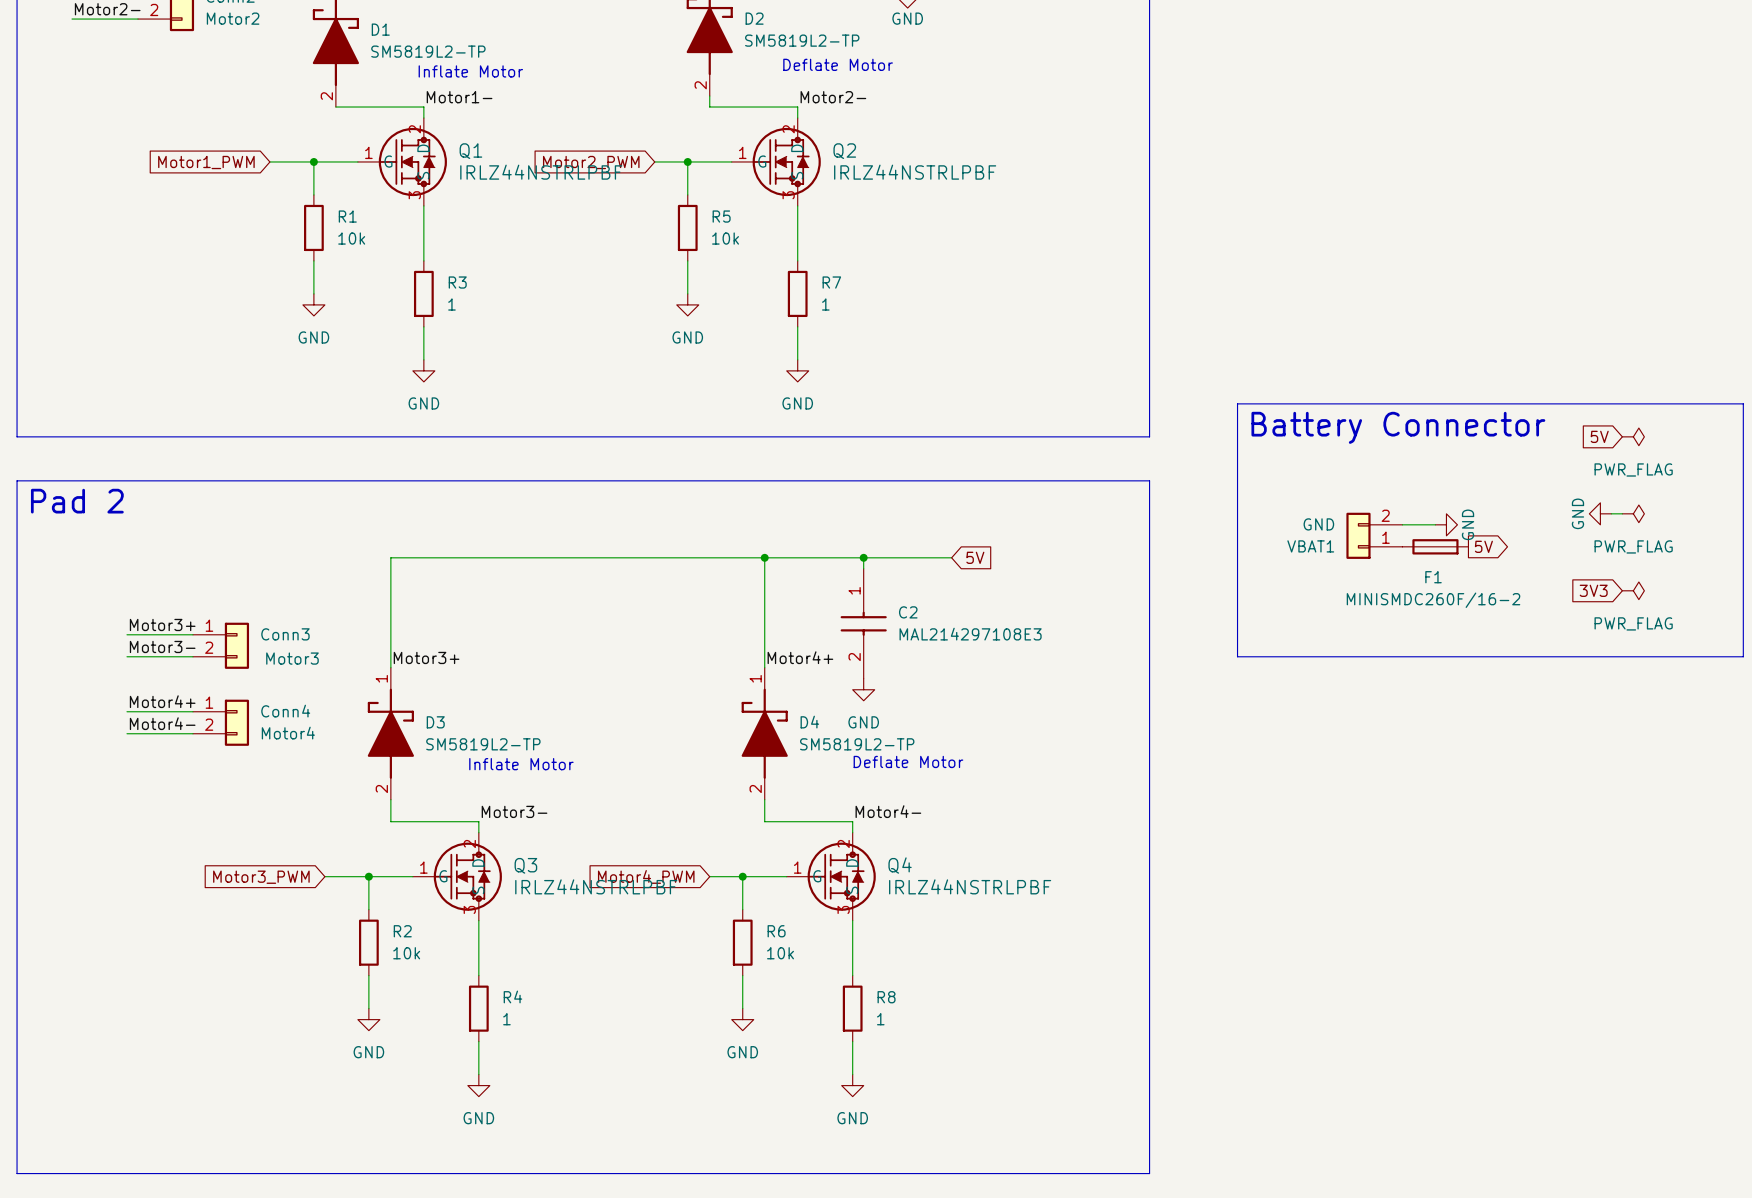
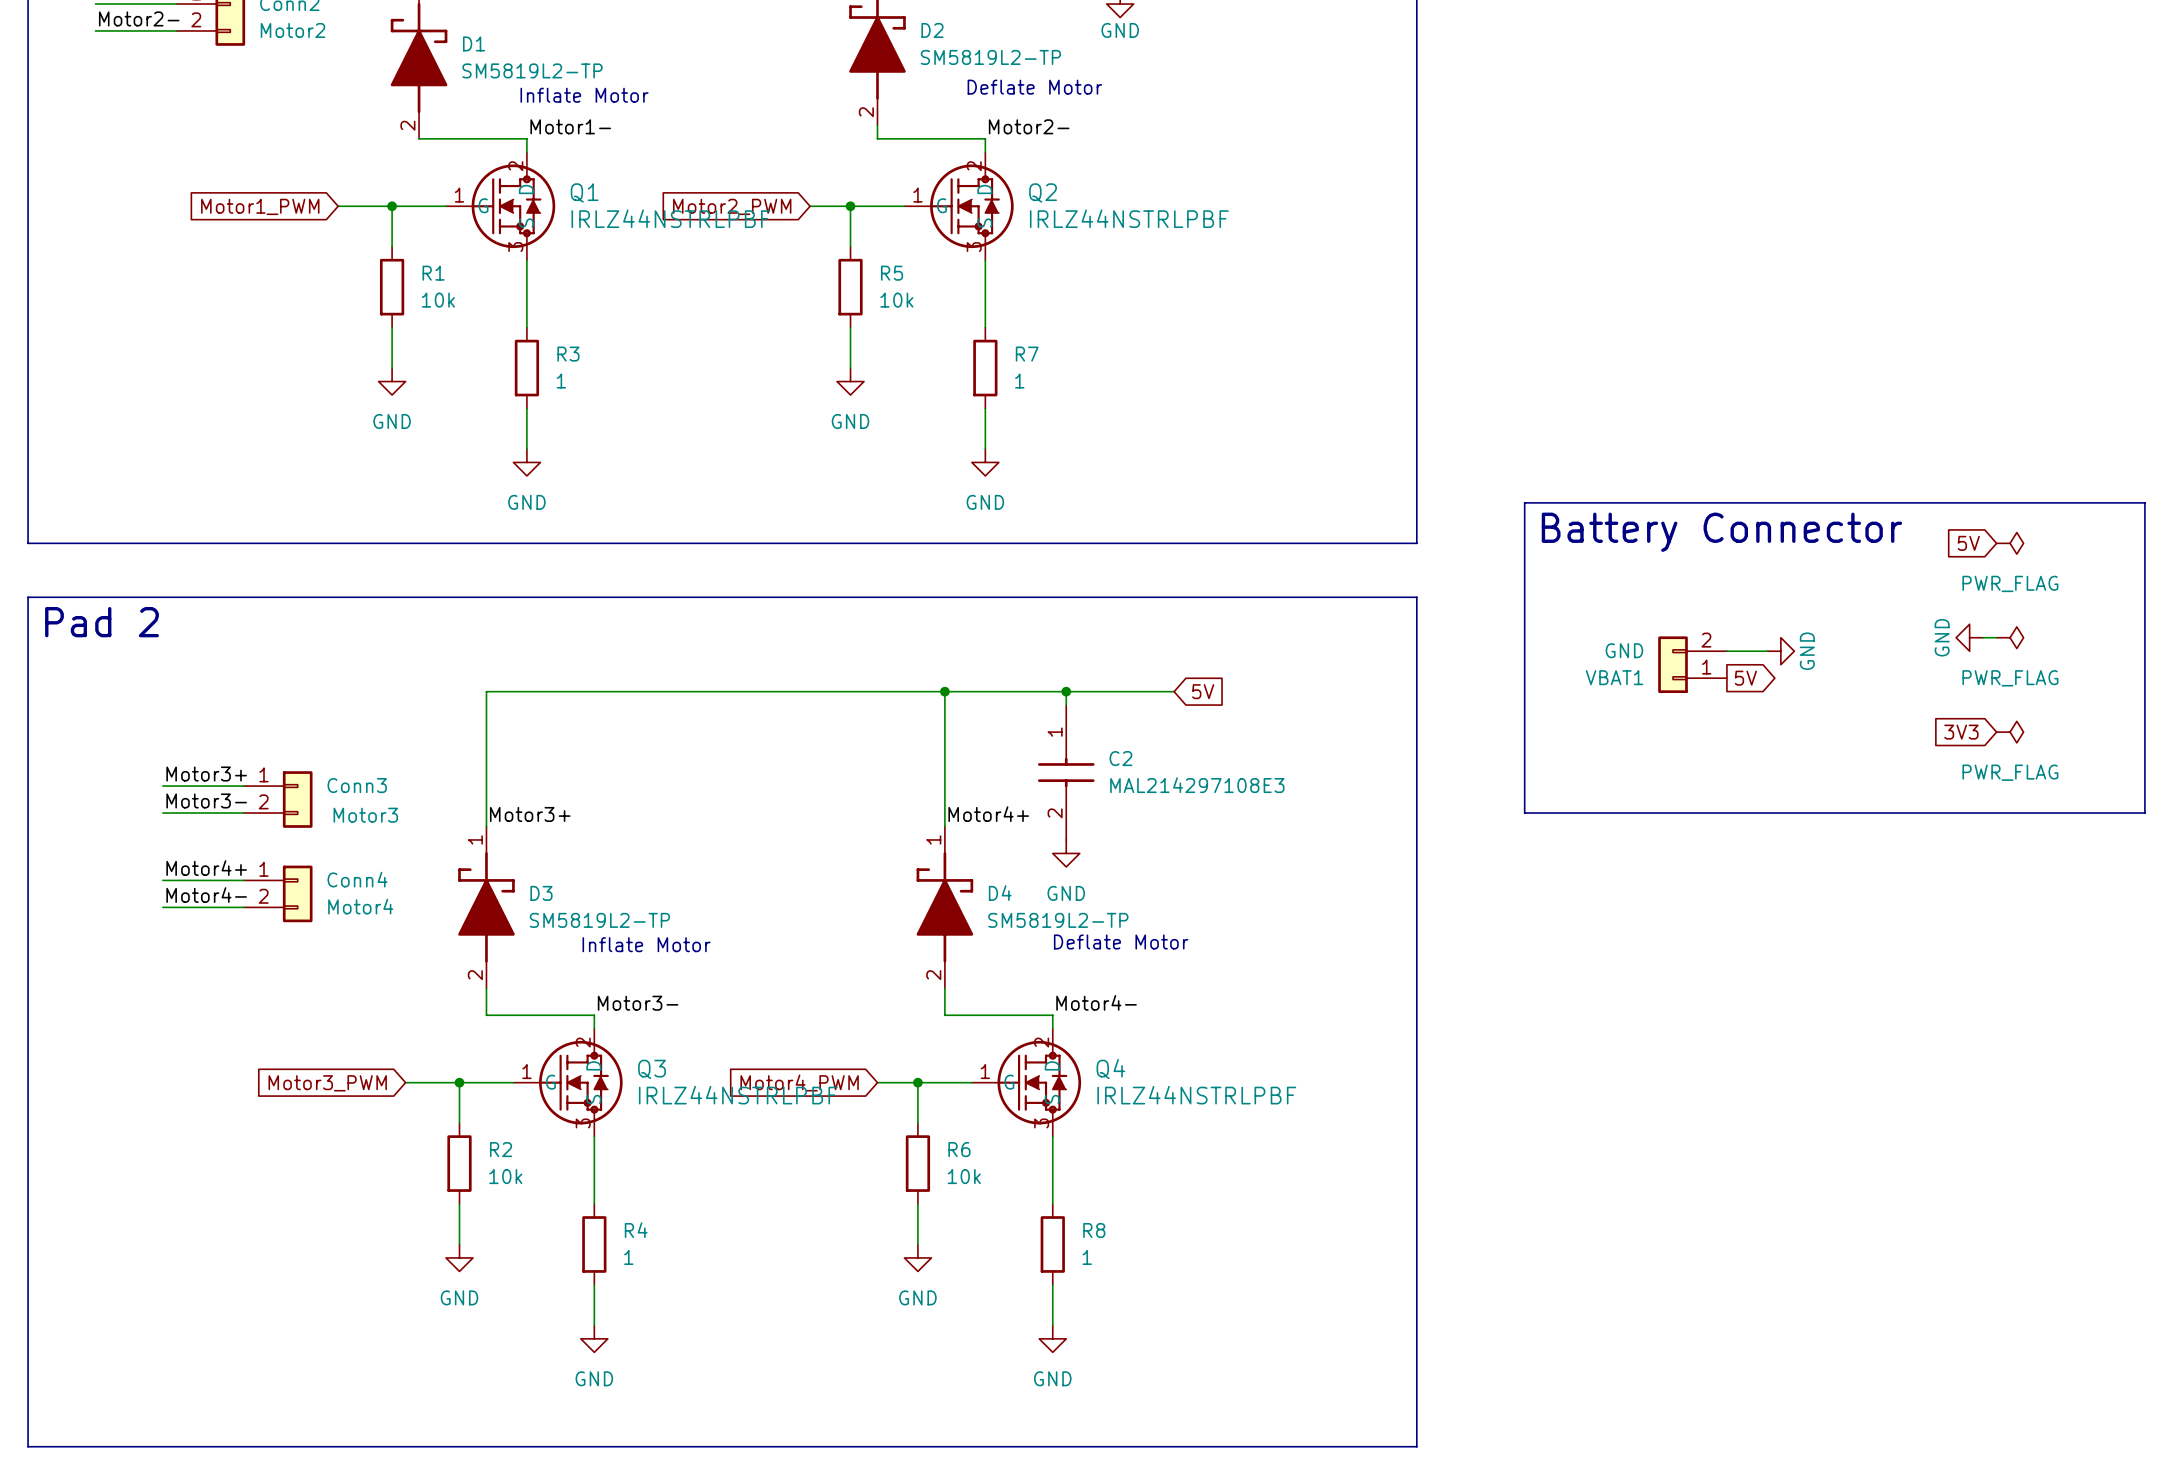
F1: MINISMDC260F/16-2 (1435, 546) -> none
global label position: 5V (1483, 546) -> 5V (1745, 678)

